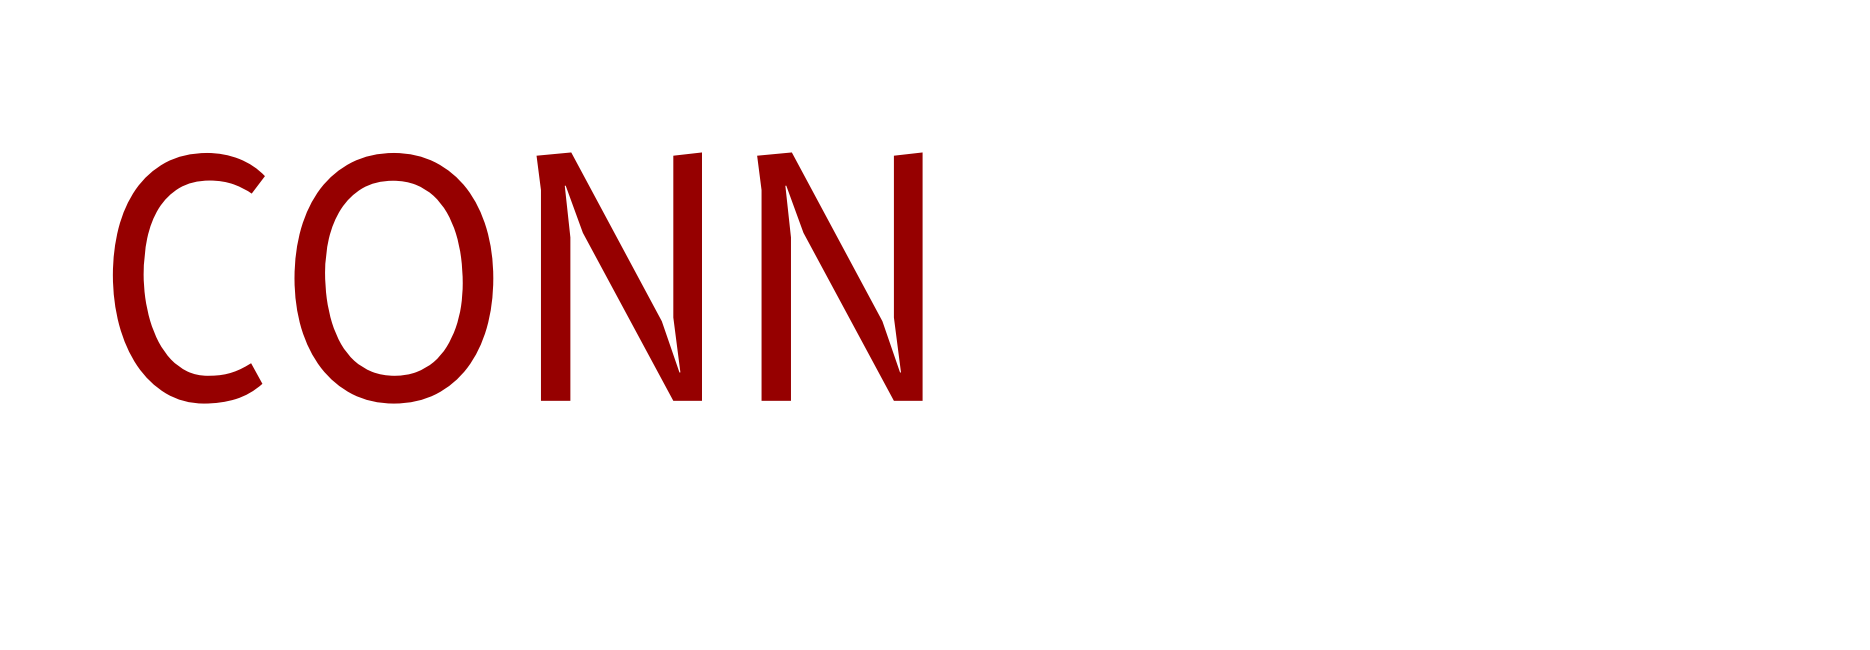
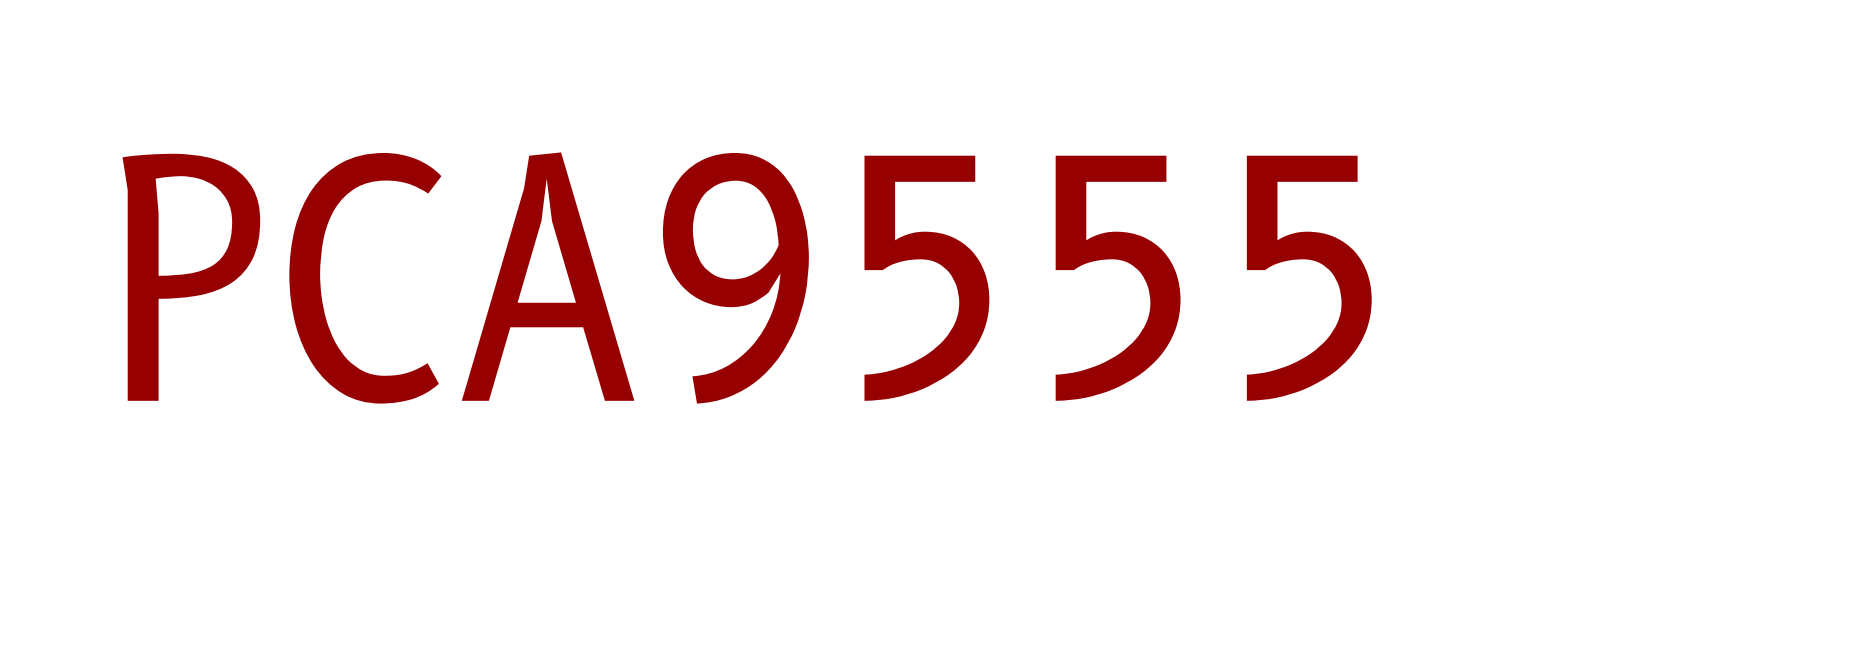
text: CONN (517, 278) -> PCA9555 (747, 278)

